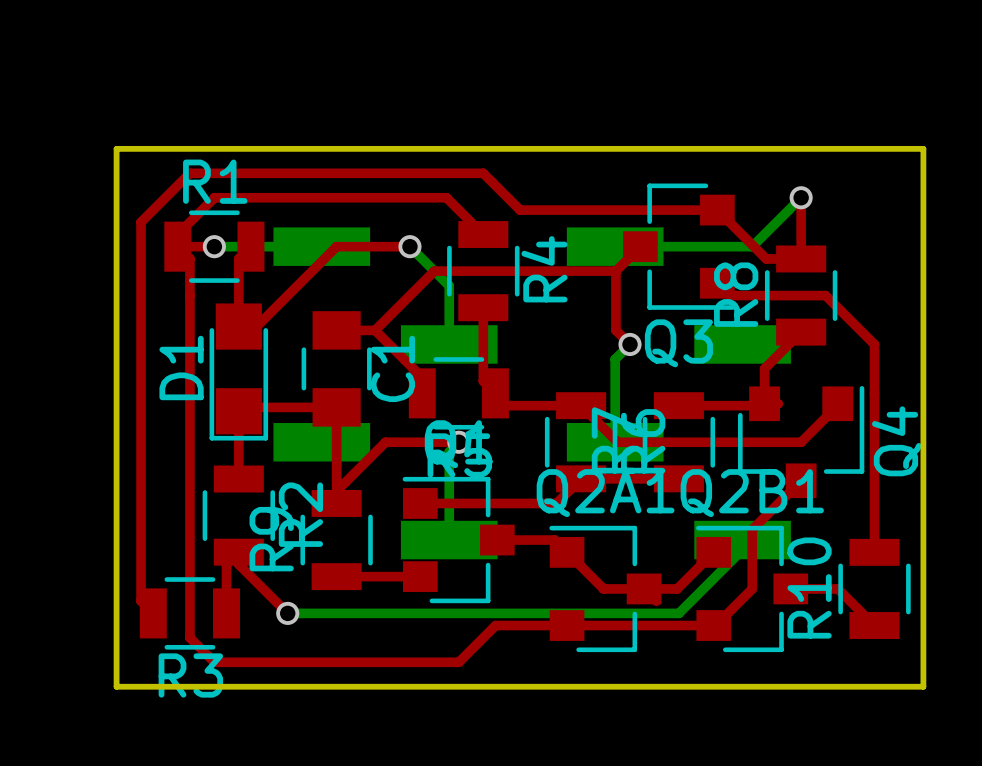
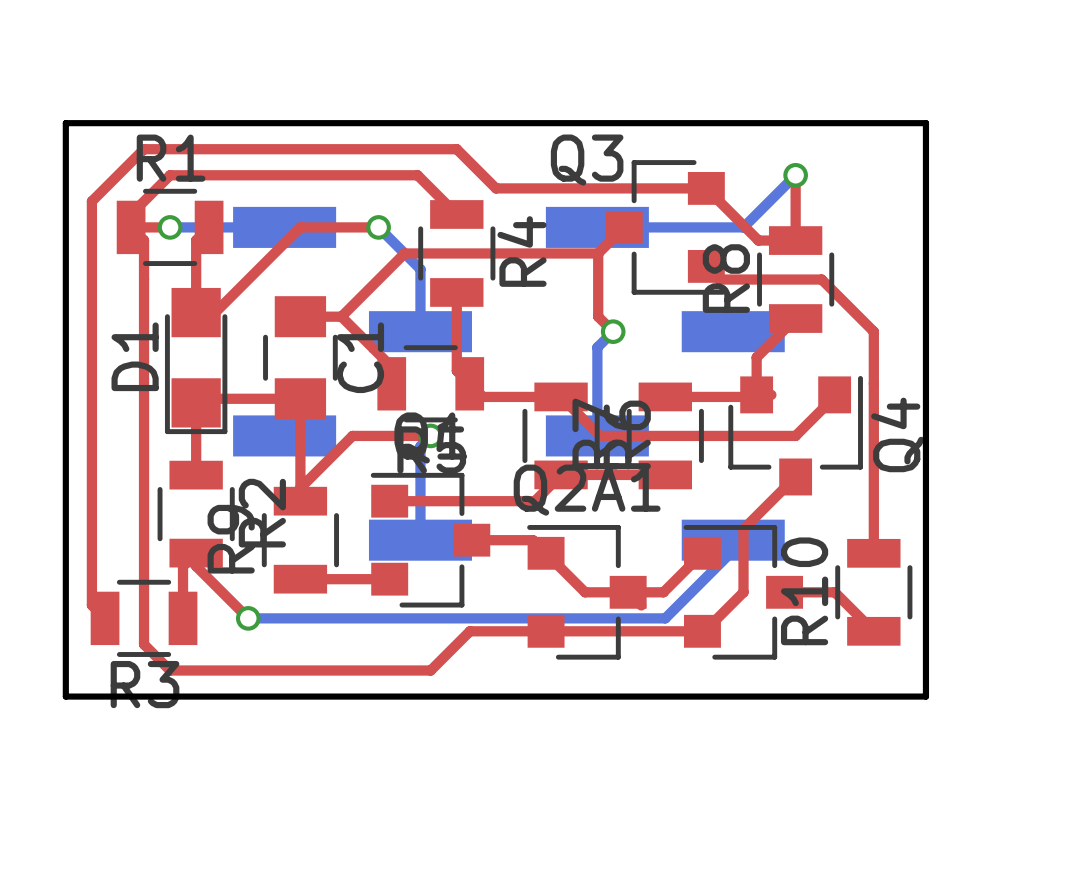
Q3 name position: Q3 (678, 343) -> Q3 (587, 160)
Q2B1 name: Q2B1 (752, 493) -> none

